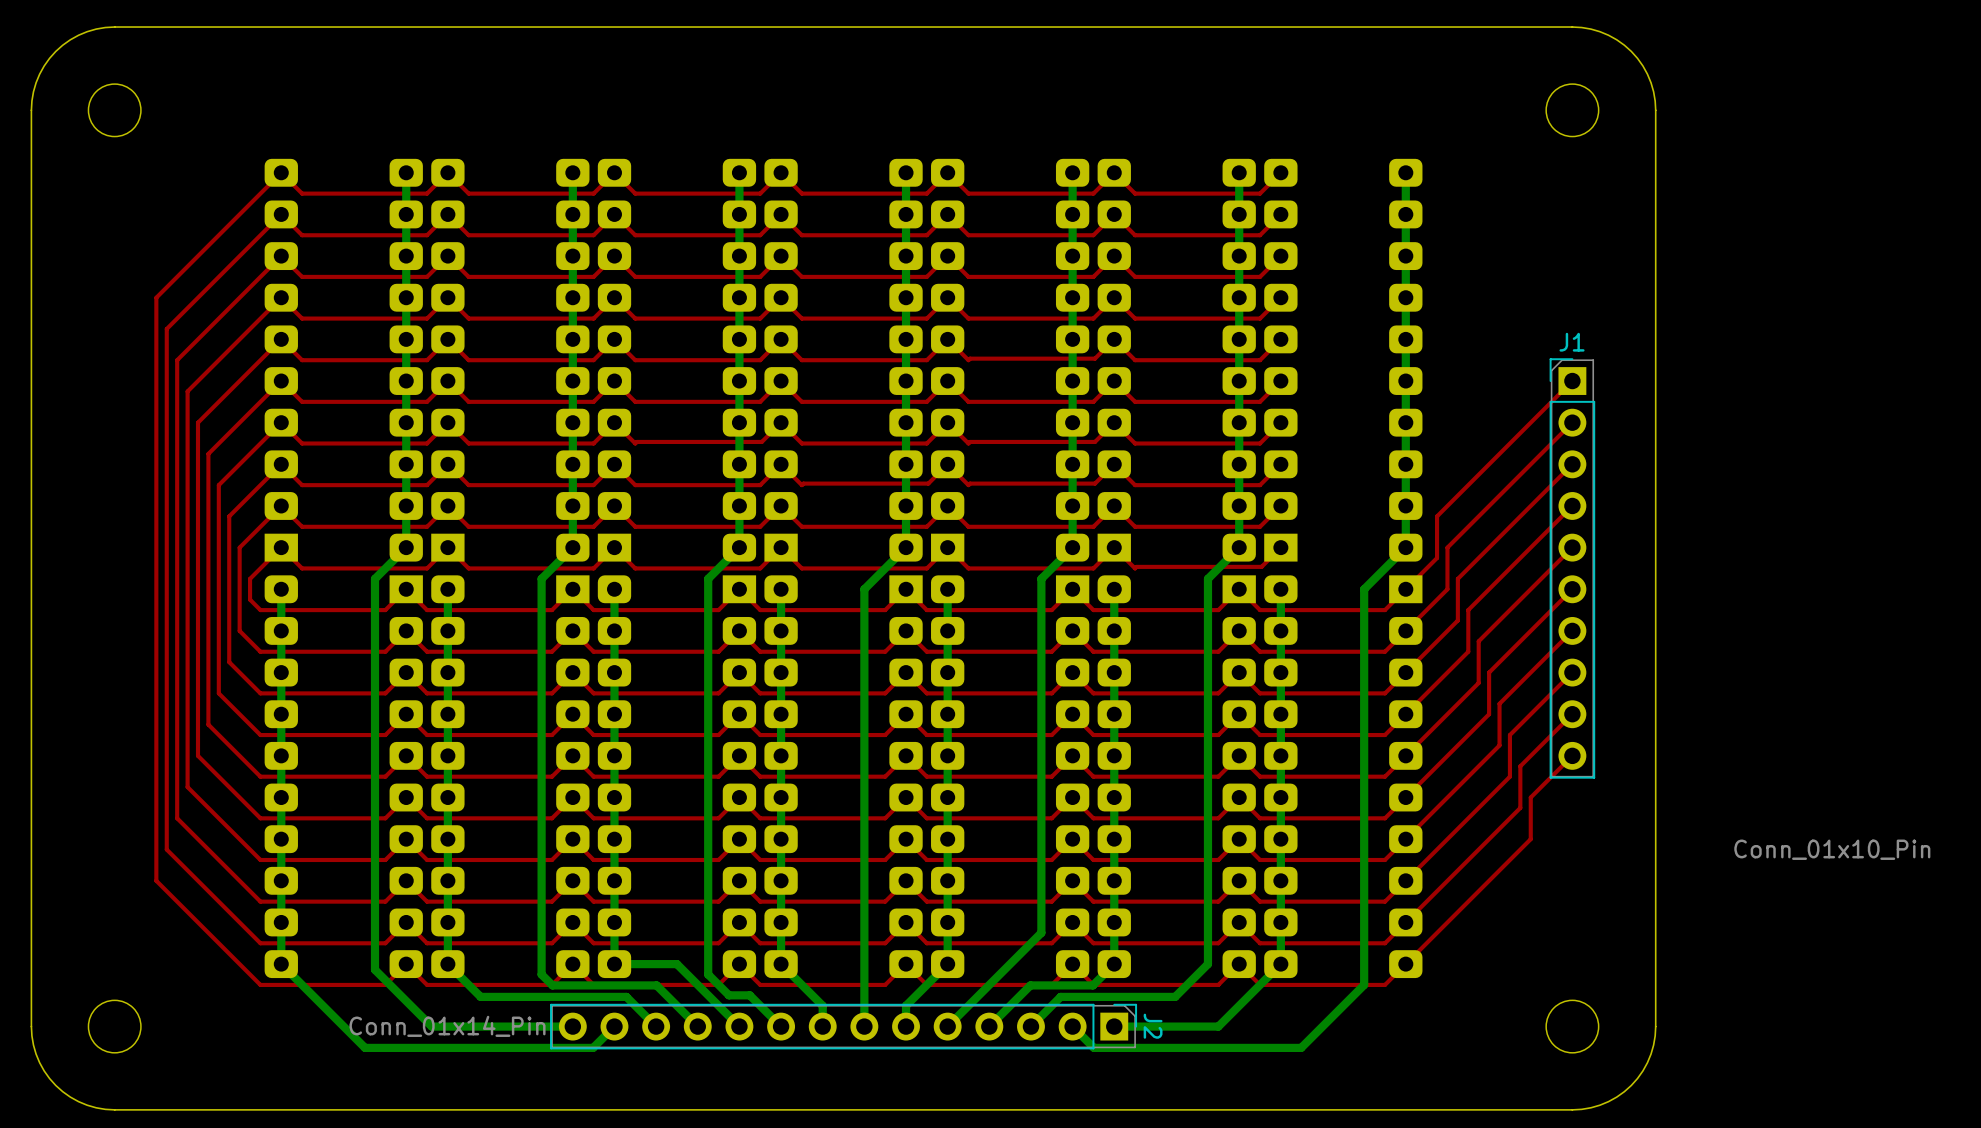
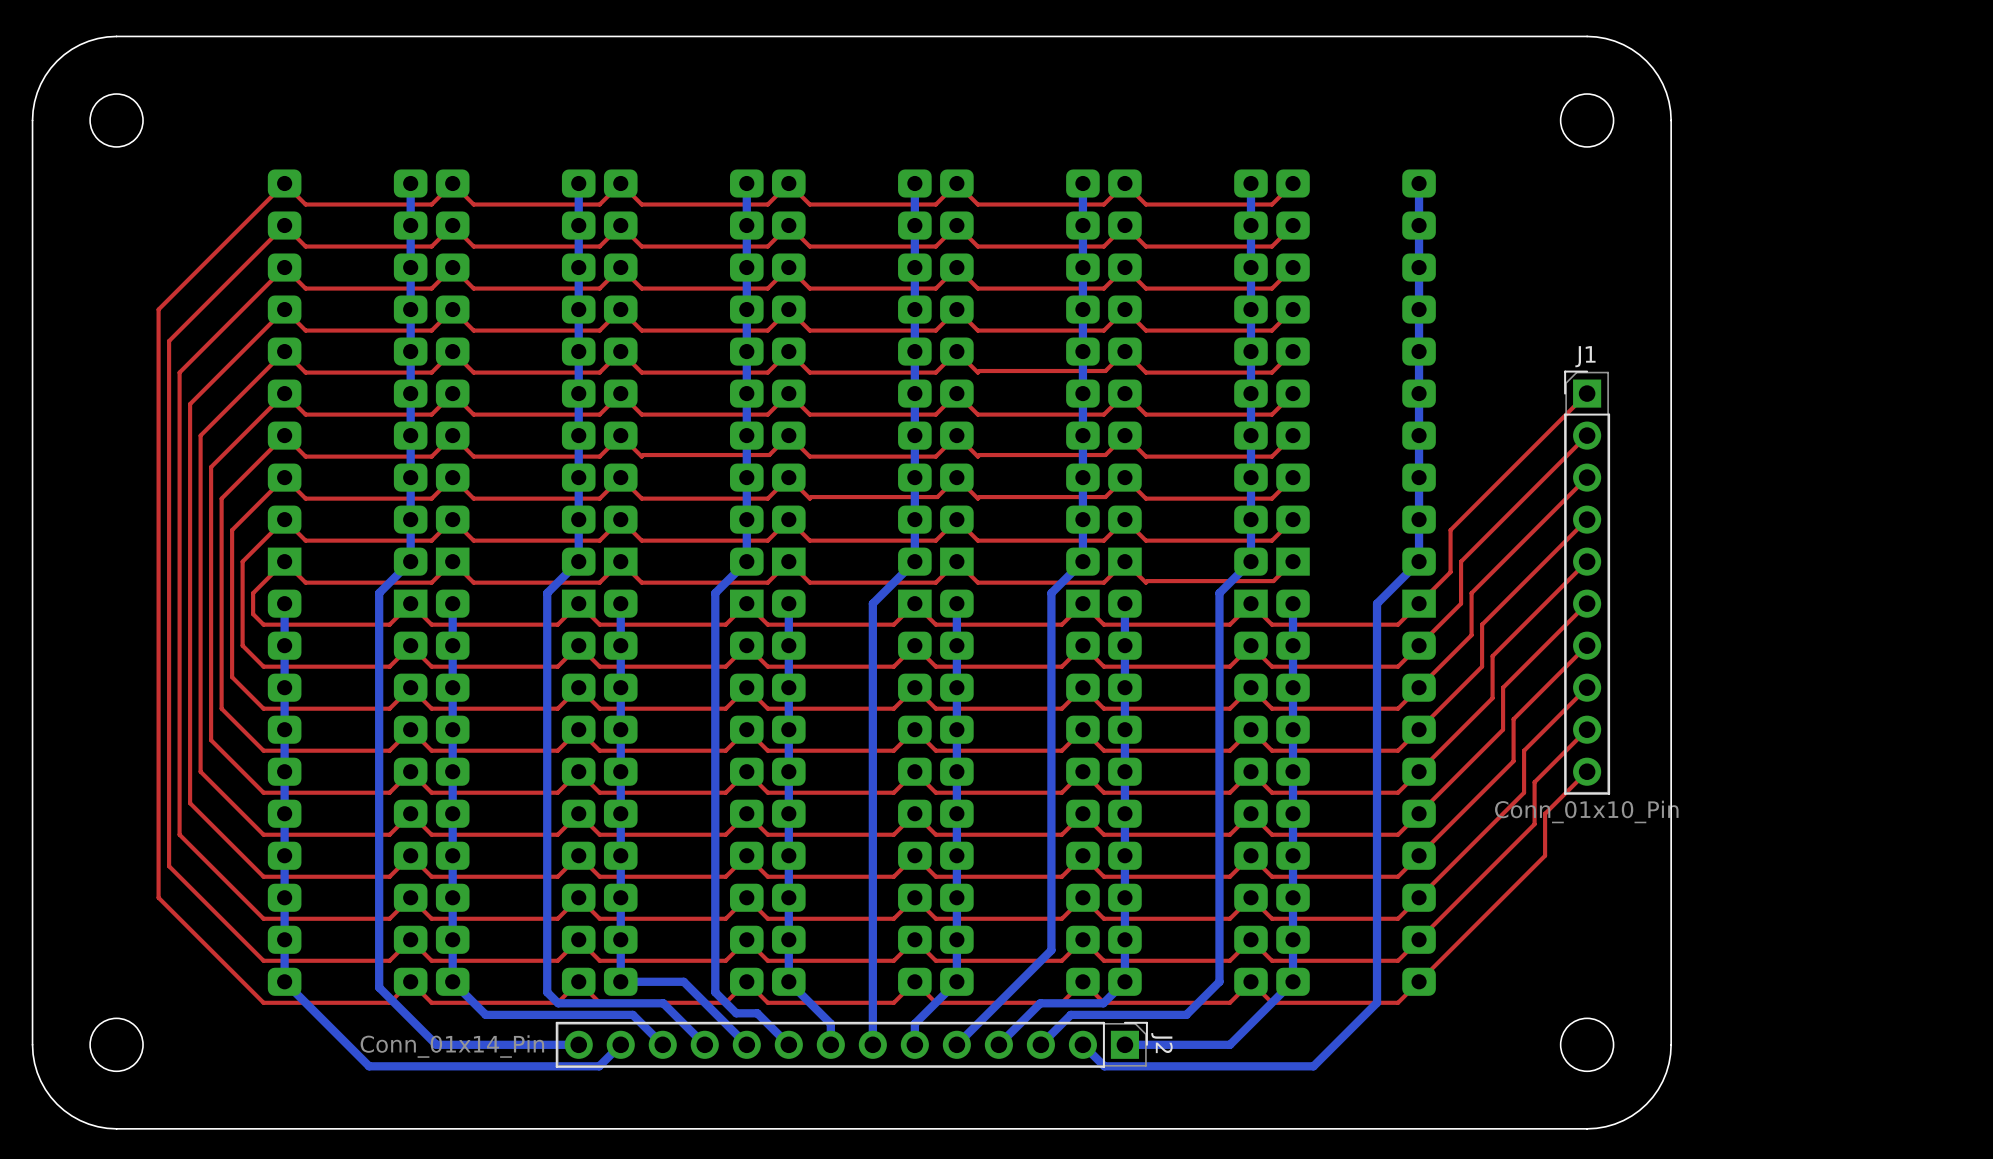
J1 value position: Conn_01x10_Pin (1832, 849) -> Conn_01x10_Pin (1586, 811)

